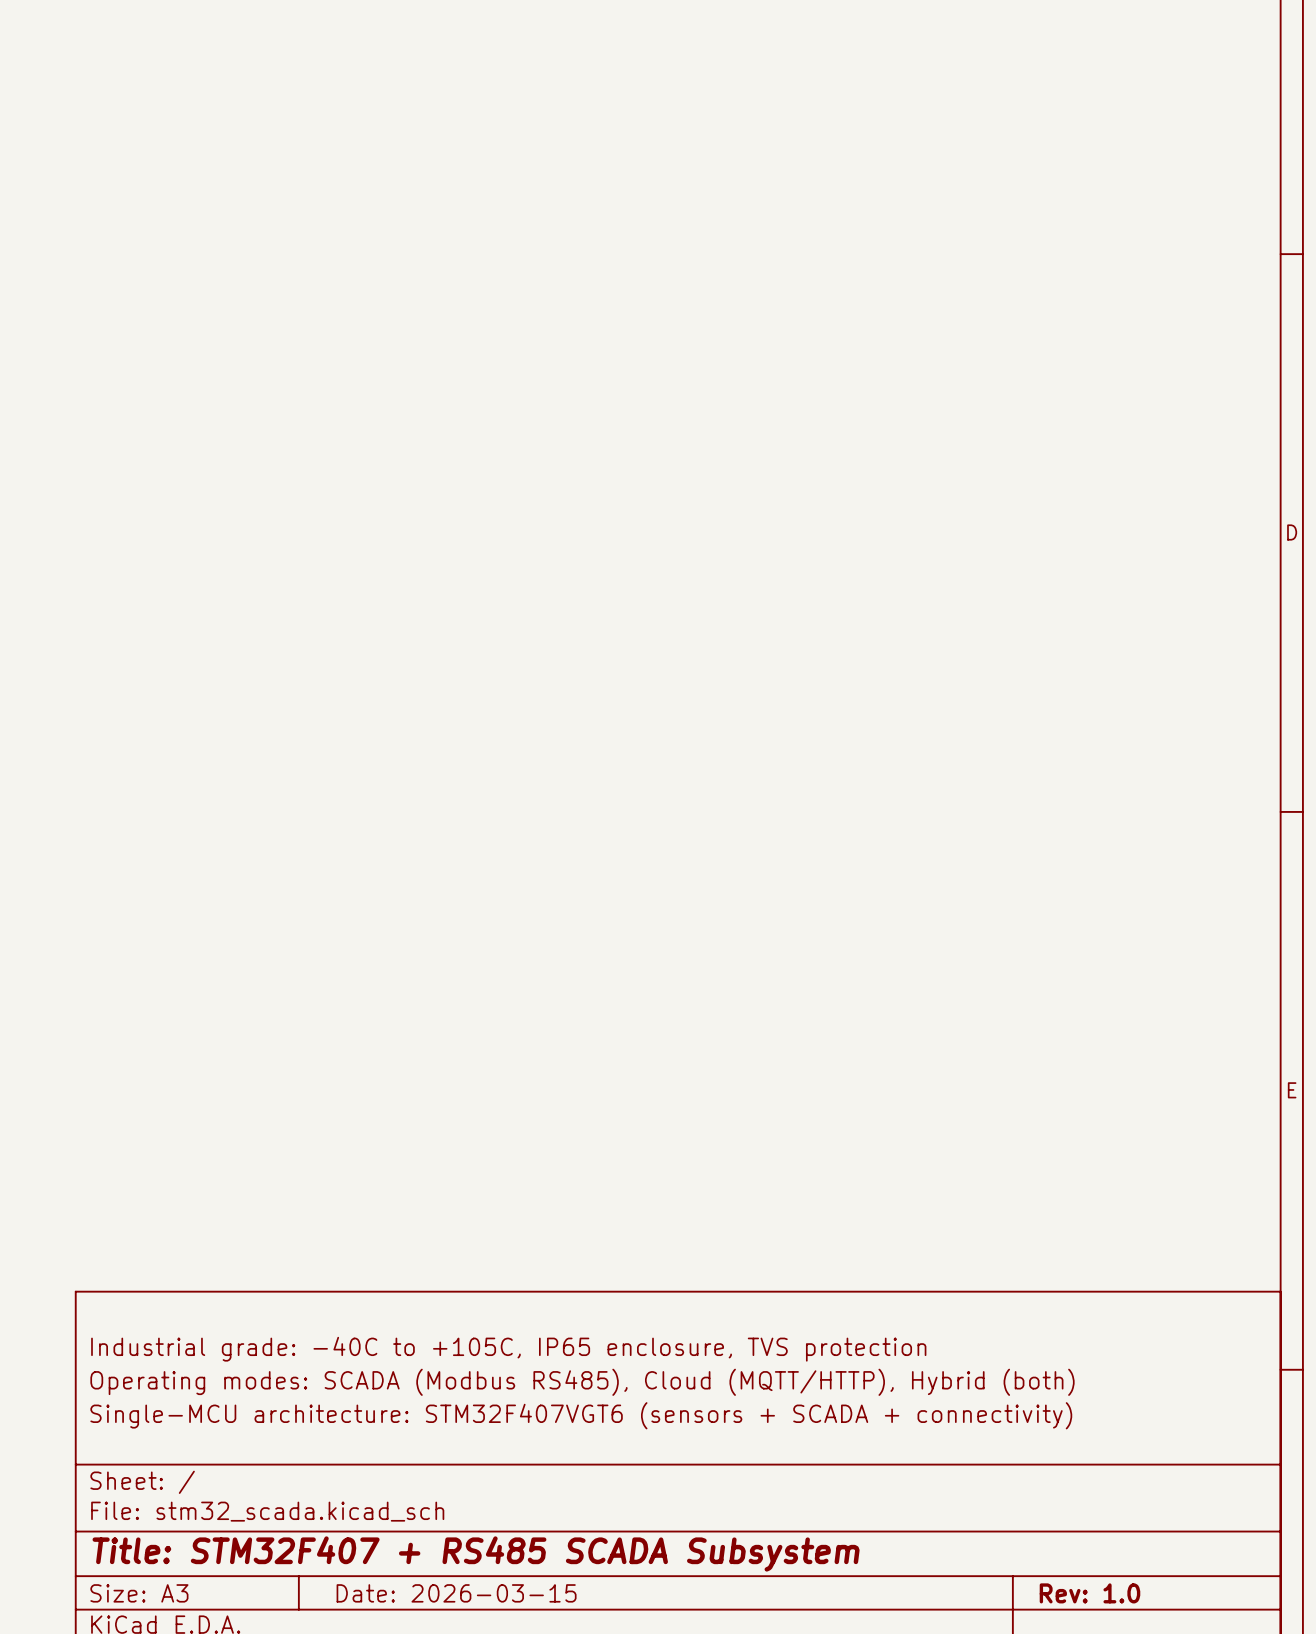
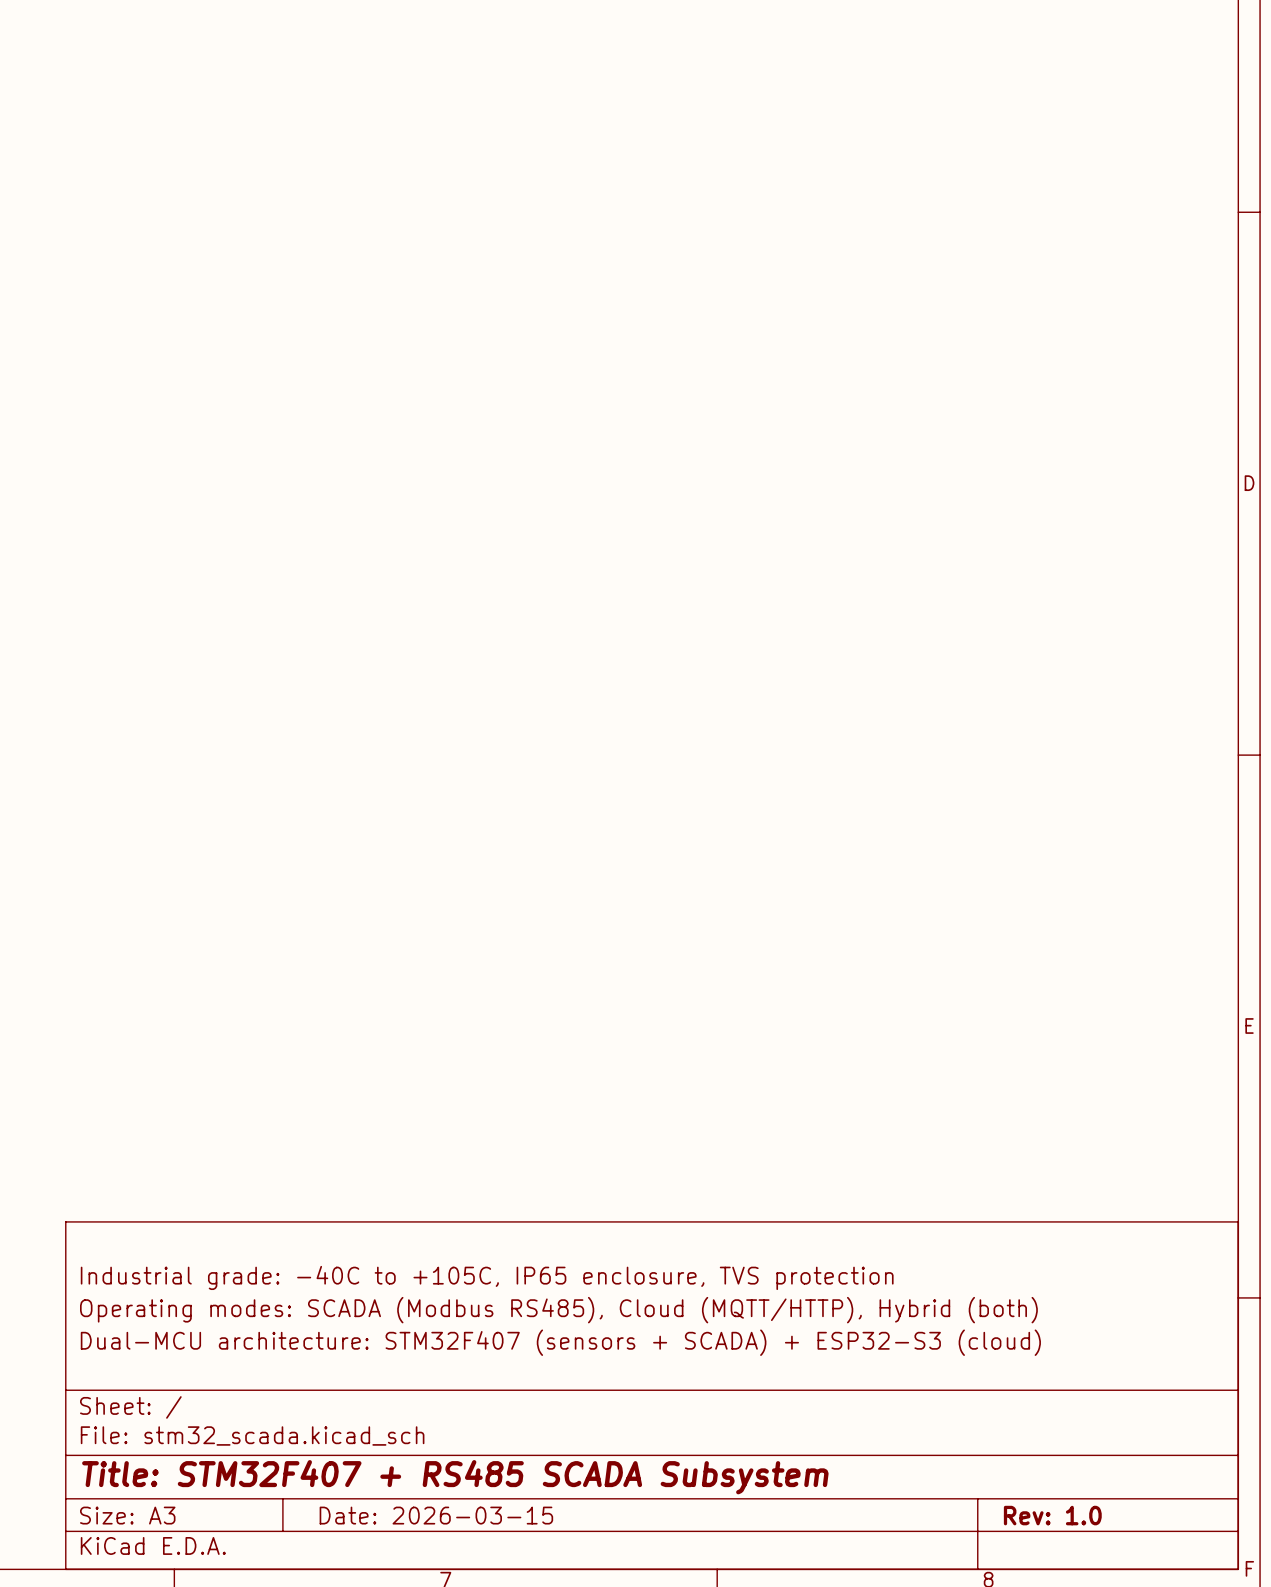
title block: Single-MCU architecture: STM32F407VGT6 (sensors + SCADA + connectivity) (581, 1415) -> Dual-MCU architecture: STM32F407 (sensors + SCADA) + ESP32-S3 (cloud) (560, 1342)

